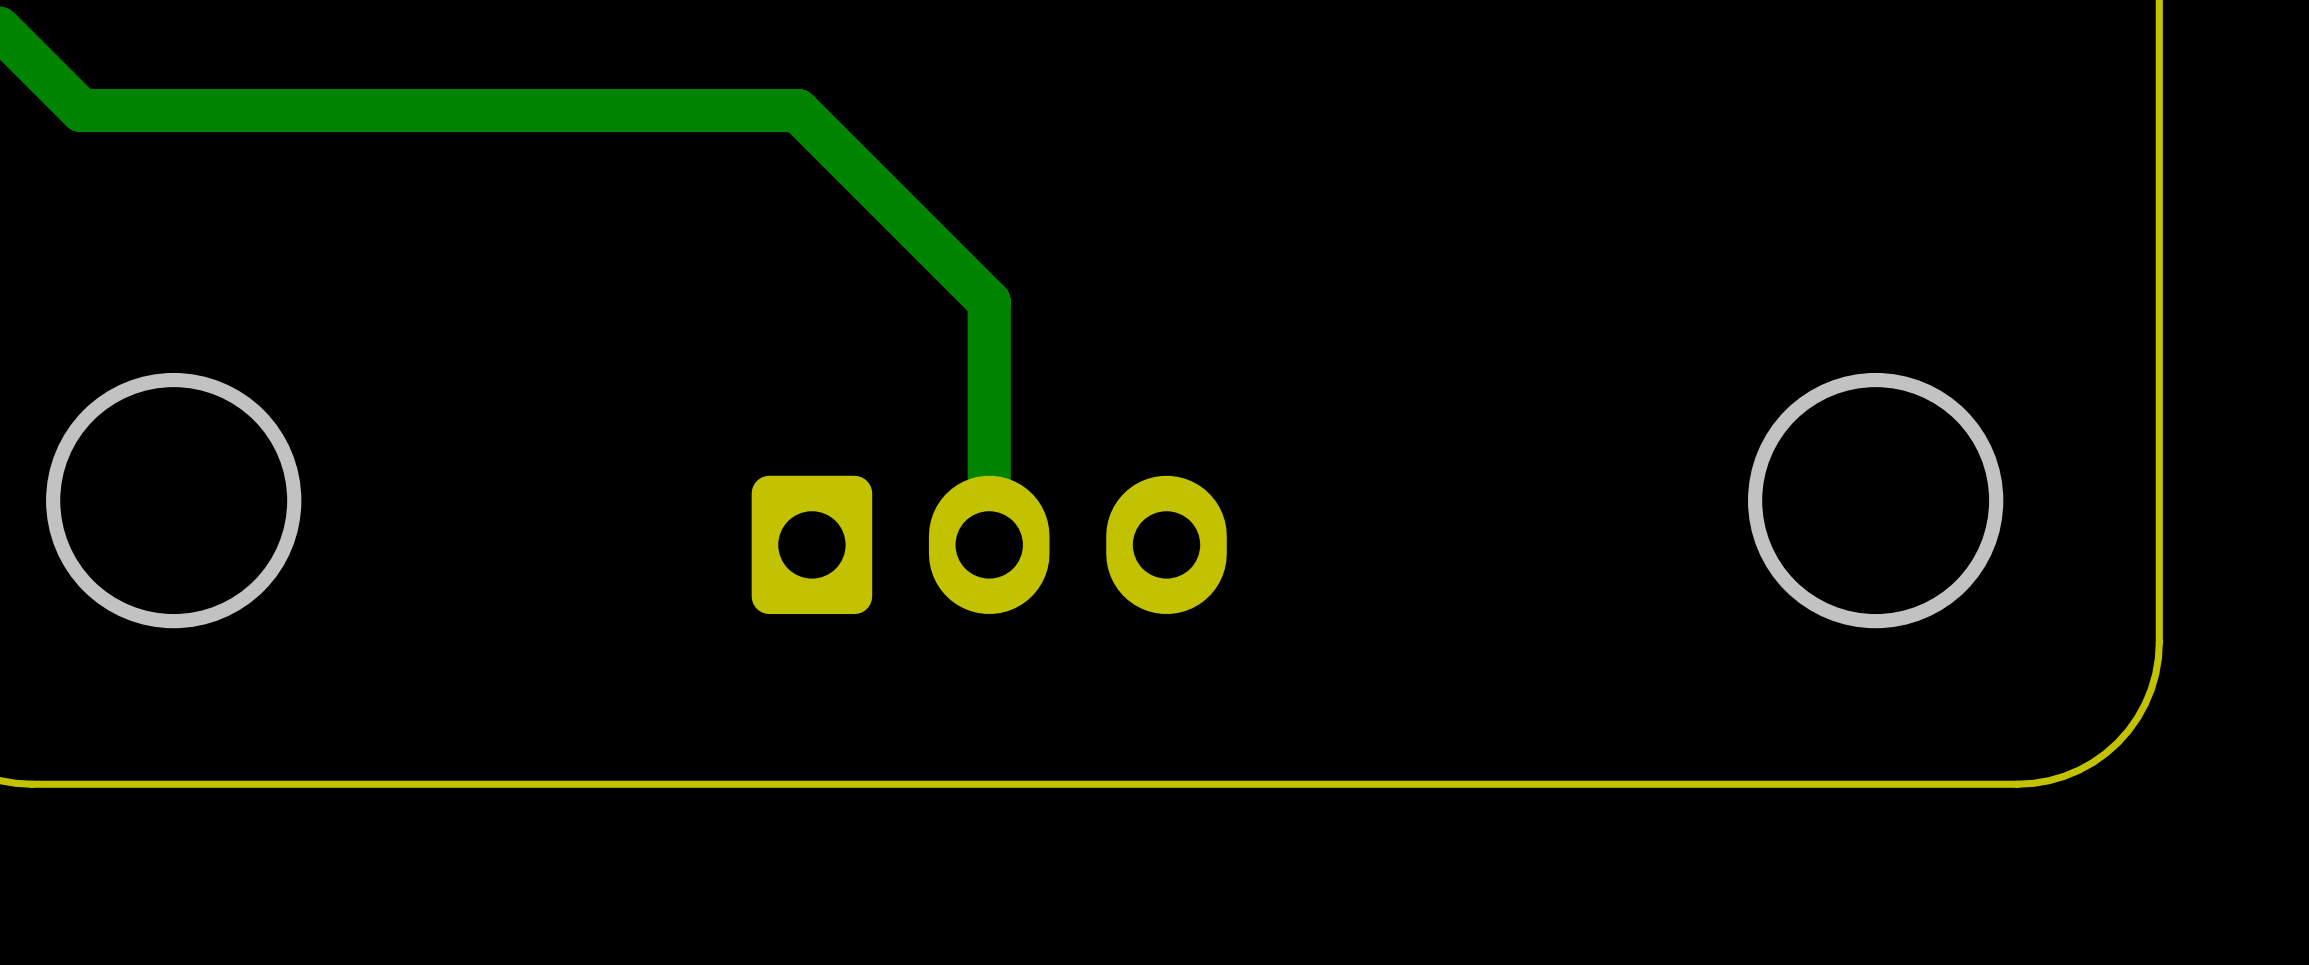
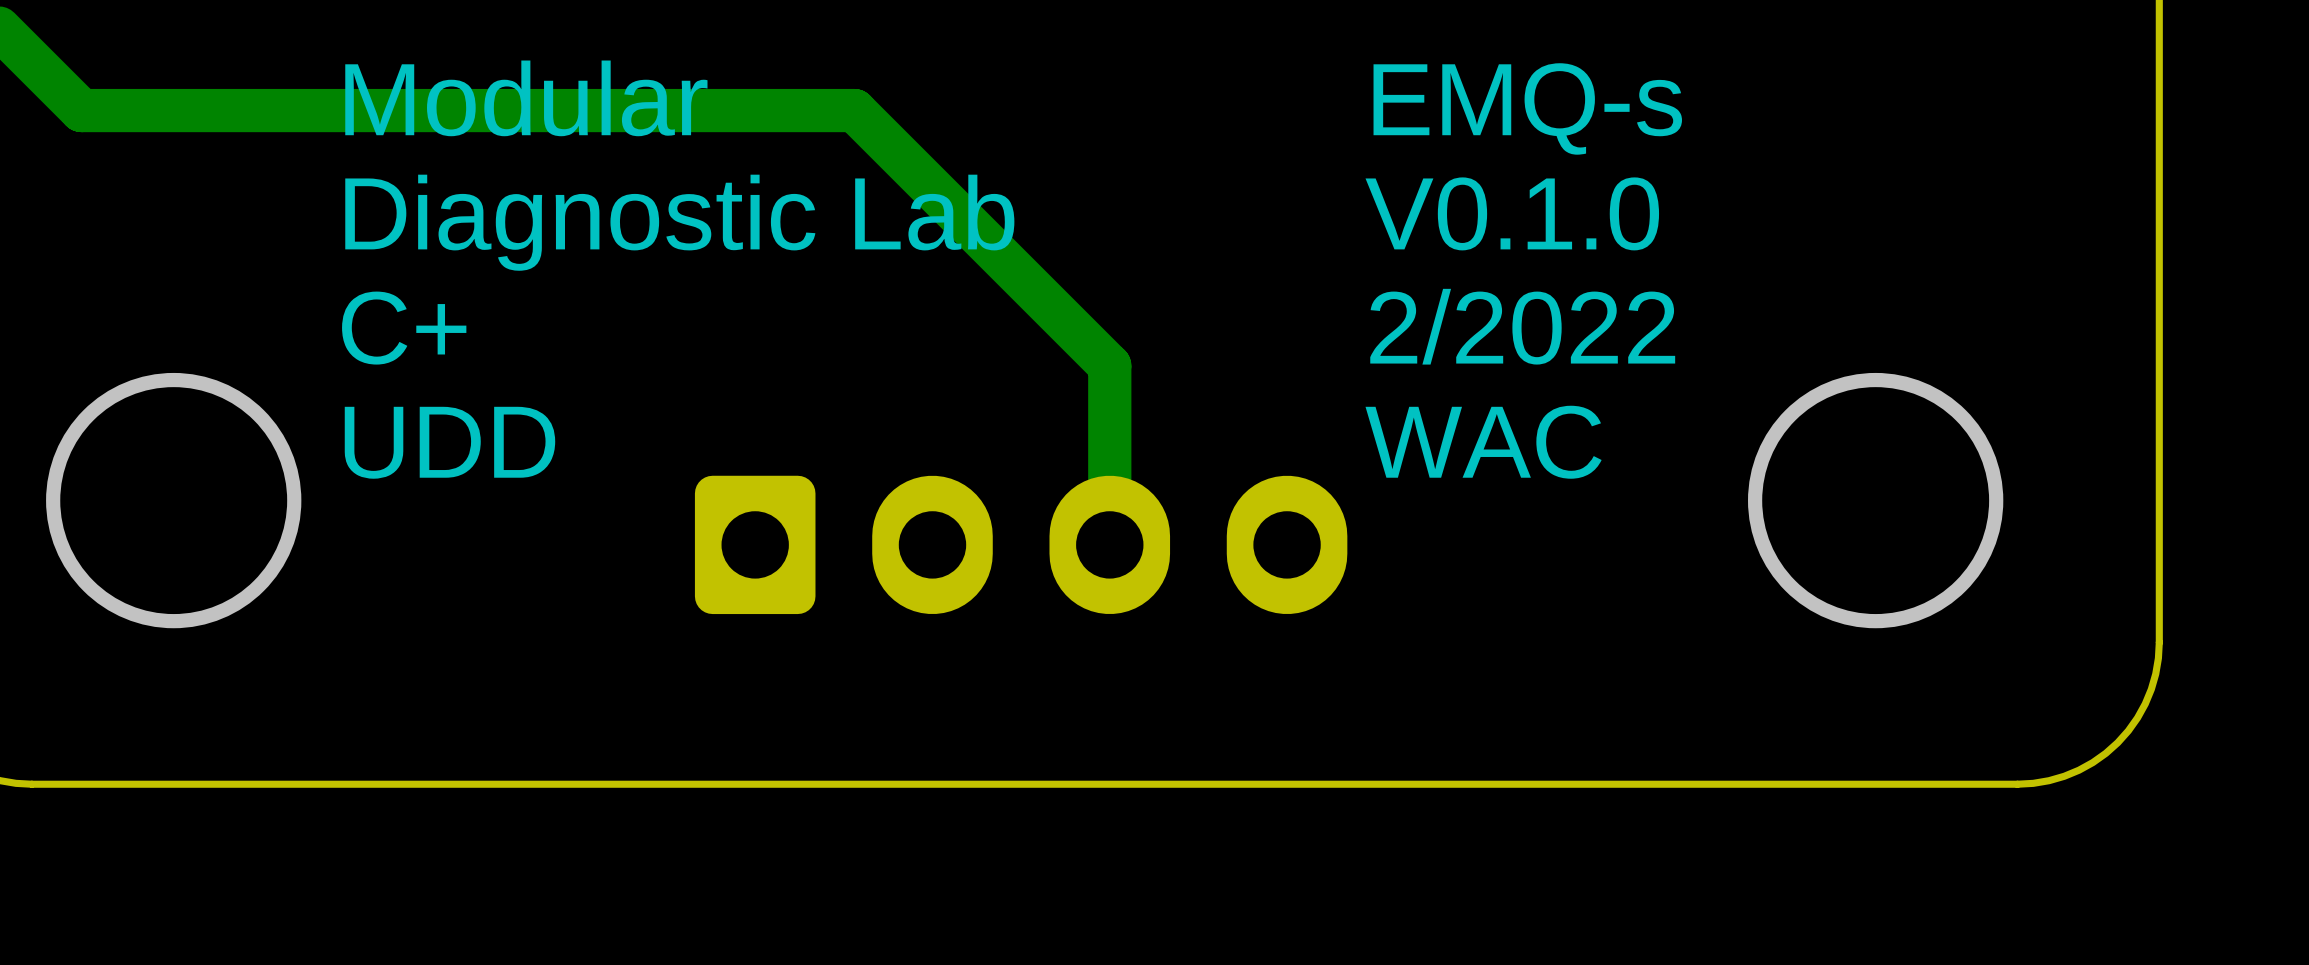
text: none -> Modular (526, 98)
text: none -> EMQ-s (1527, 108)
track: (797, 110) (989, 302) (989, 544) -> (797, 110) (854, 110) (1109, 365) (1109, 544)
text: none -> V0.1.0 (1512, 213)
text: none -> Diagnostic Lab (679, 222)
text: none -> C+ (404, 328)
text: none -> 2/2022 (1522, 326)
text: none -> UDD (449, 442)
text: none -> WAC (1483, 442)
part footprint: [751, 475, 1227, 615] -> [694, 475, 1348, 615]

